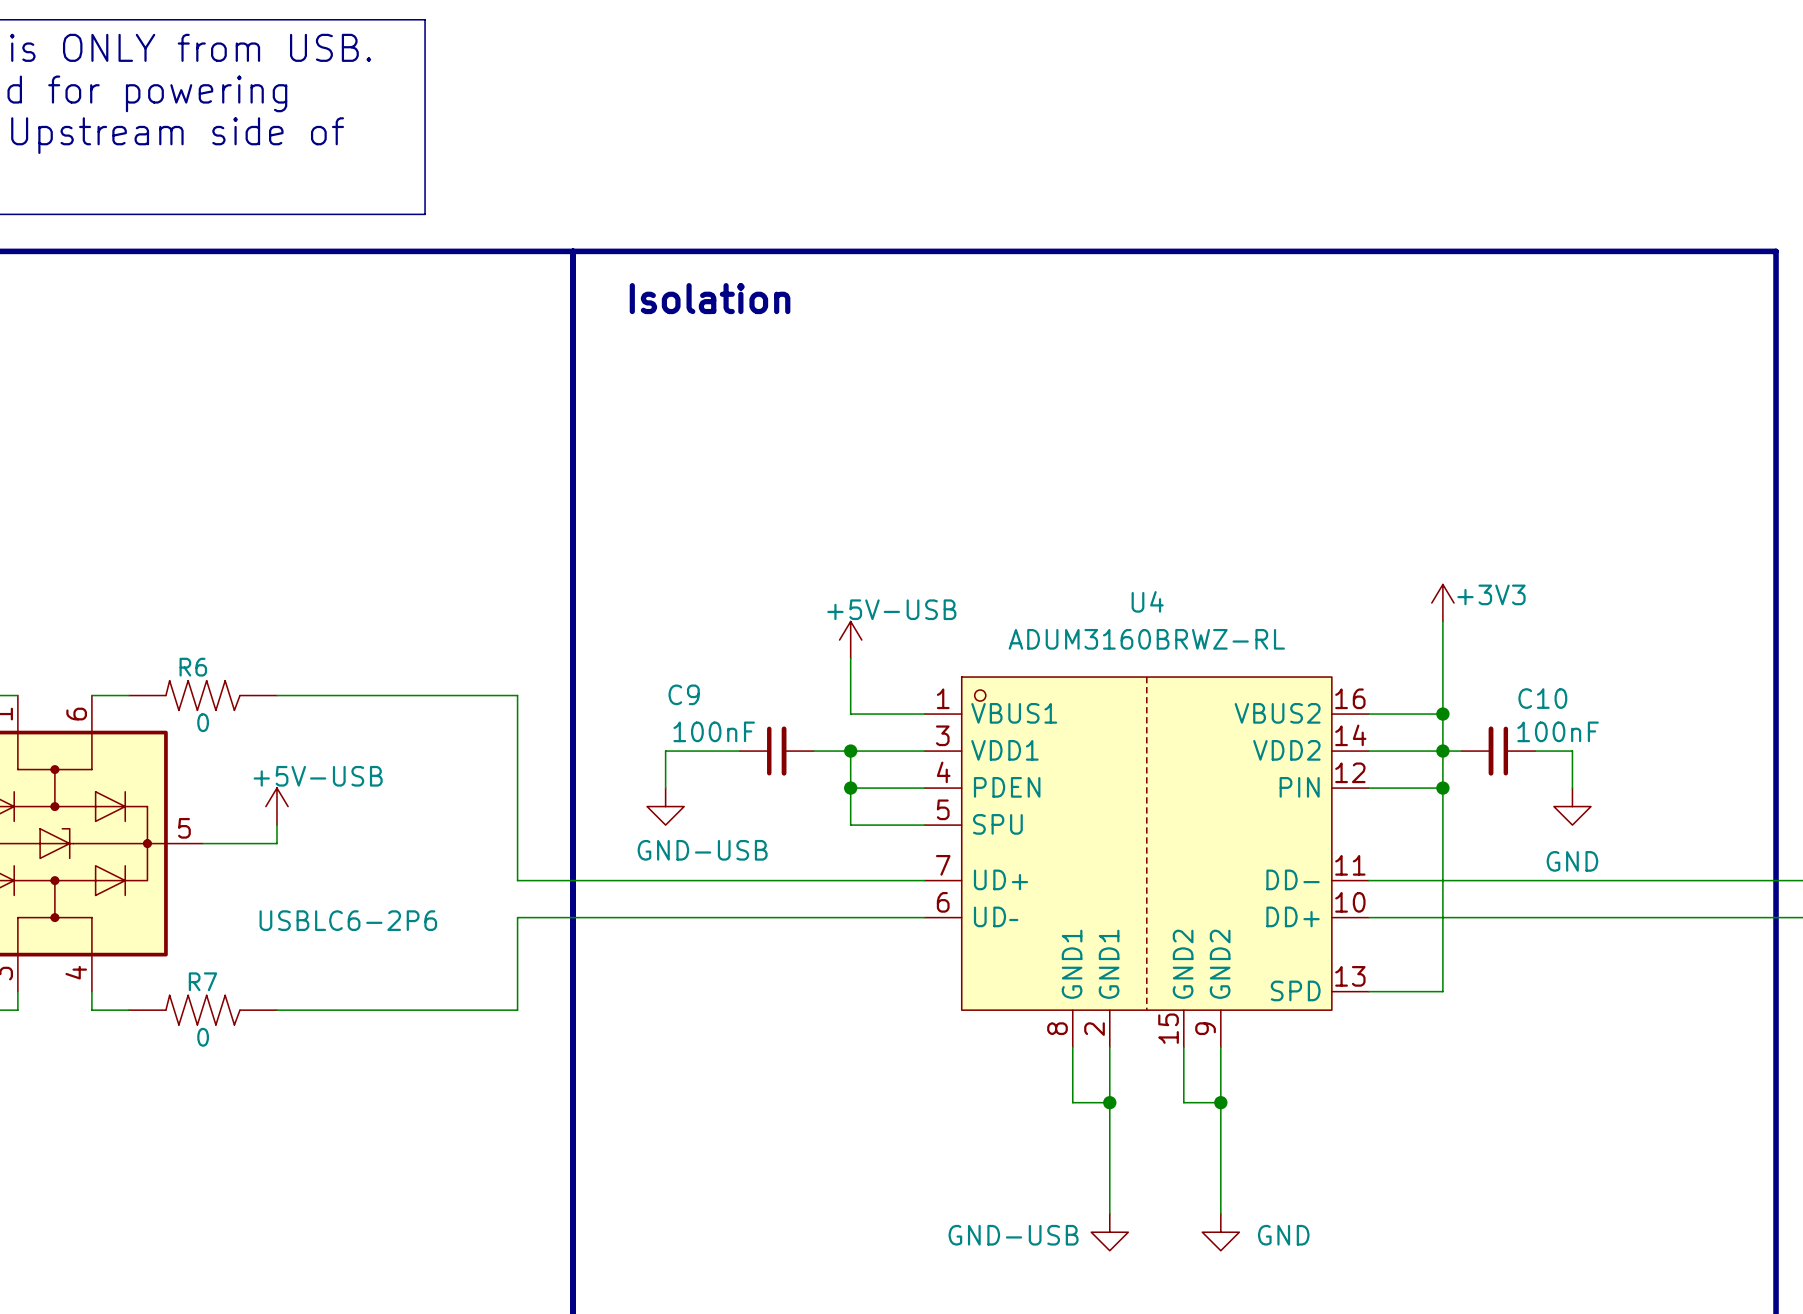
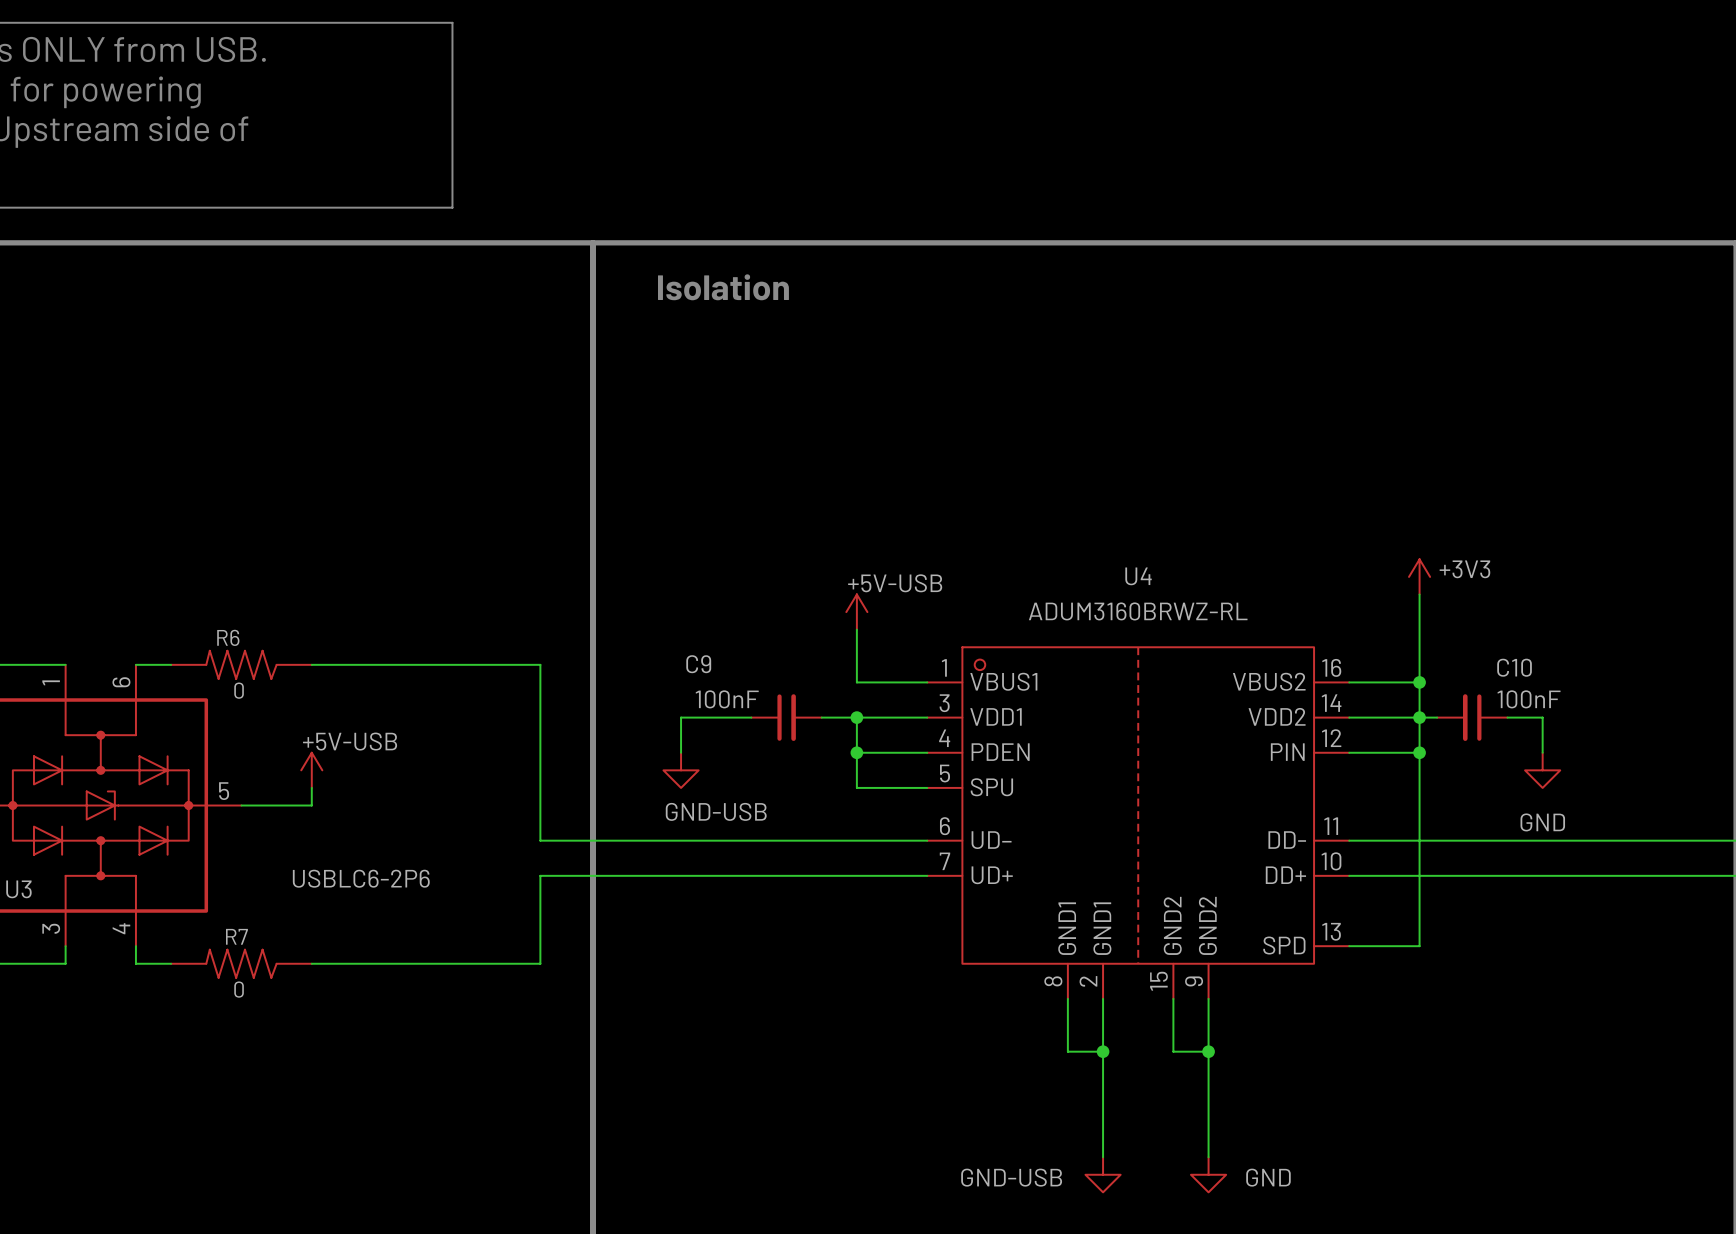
U4 pin number: 7 (943, 865) -> 6 (944, 826)
U4 pin name: UD+ (1001, 879) -> UD– (991, 840)
U4 pin number: 6 (943, 902) -> 7 (944, 861)
U4 pin name: UD– (996, 916) -> UD+ (992, 875)

